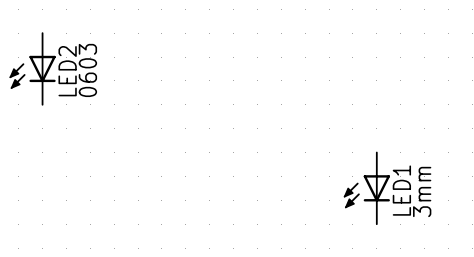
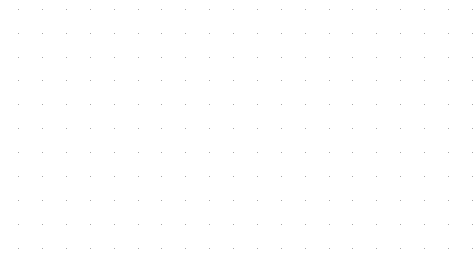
LED2: 0603 (32, 68) -> none
LED1: 3mm (366, 188) -> none

